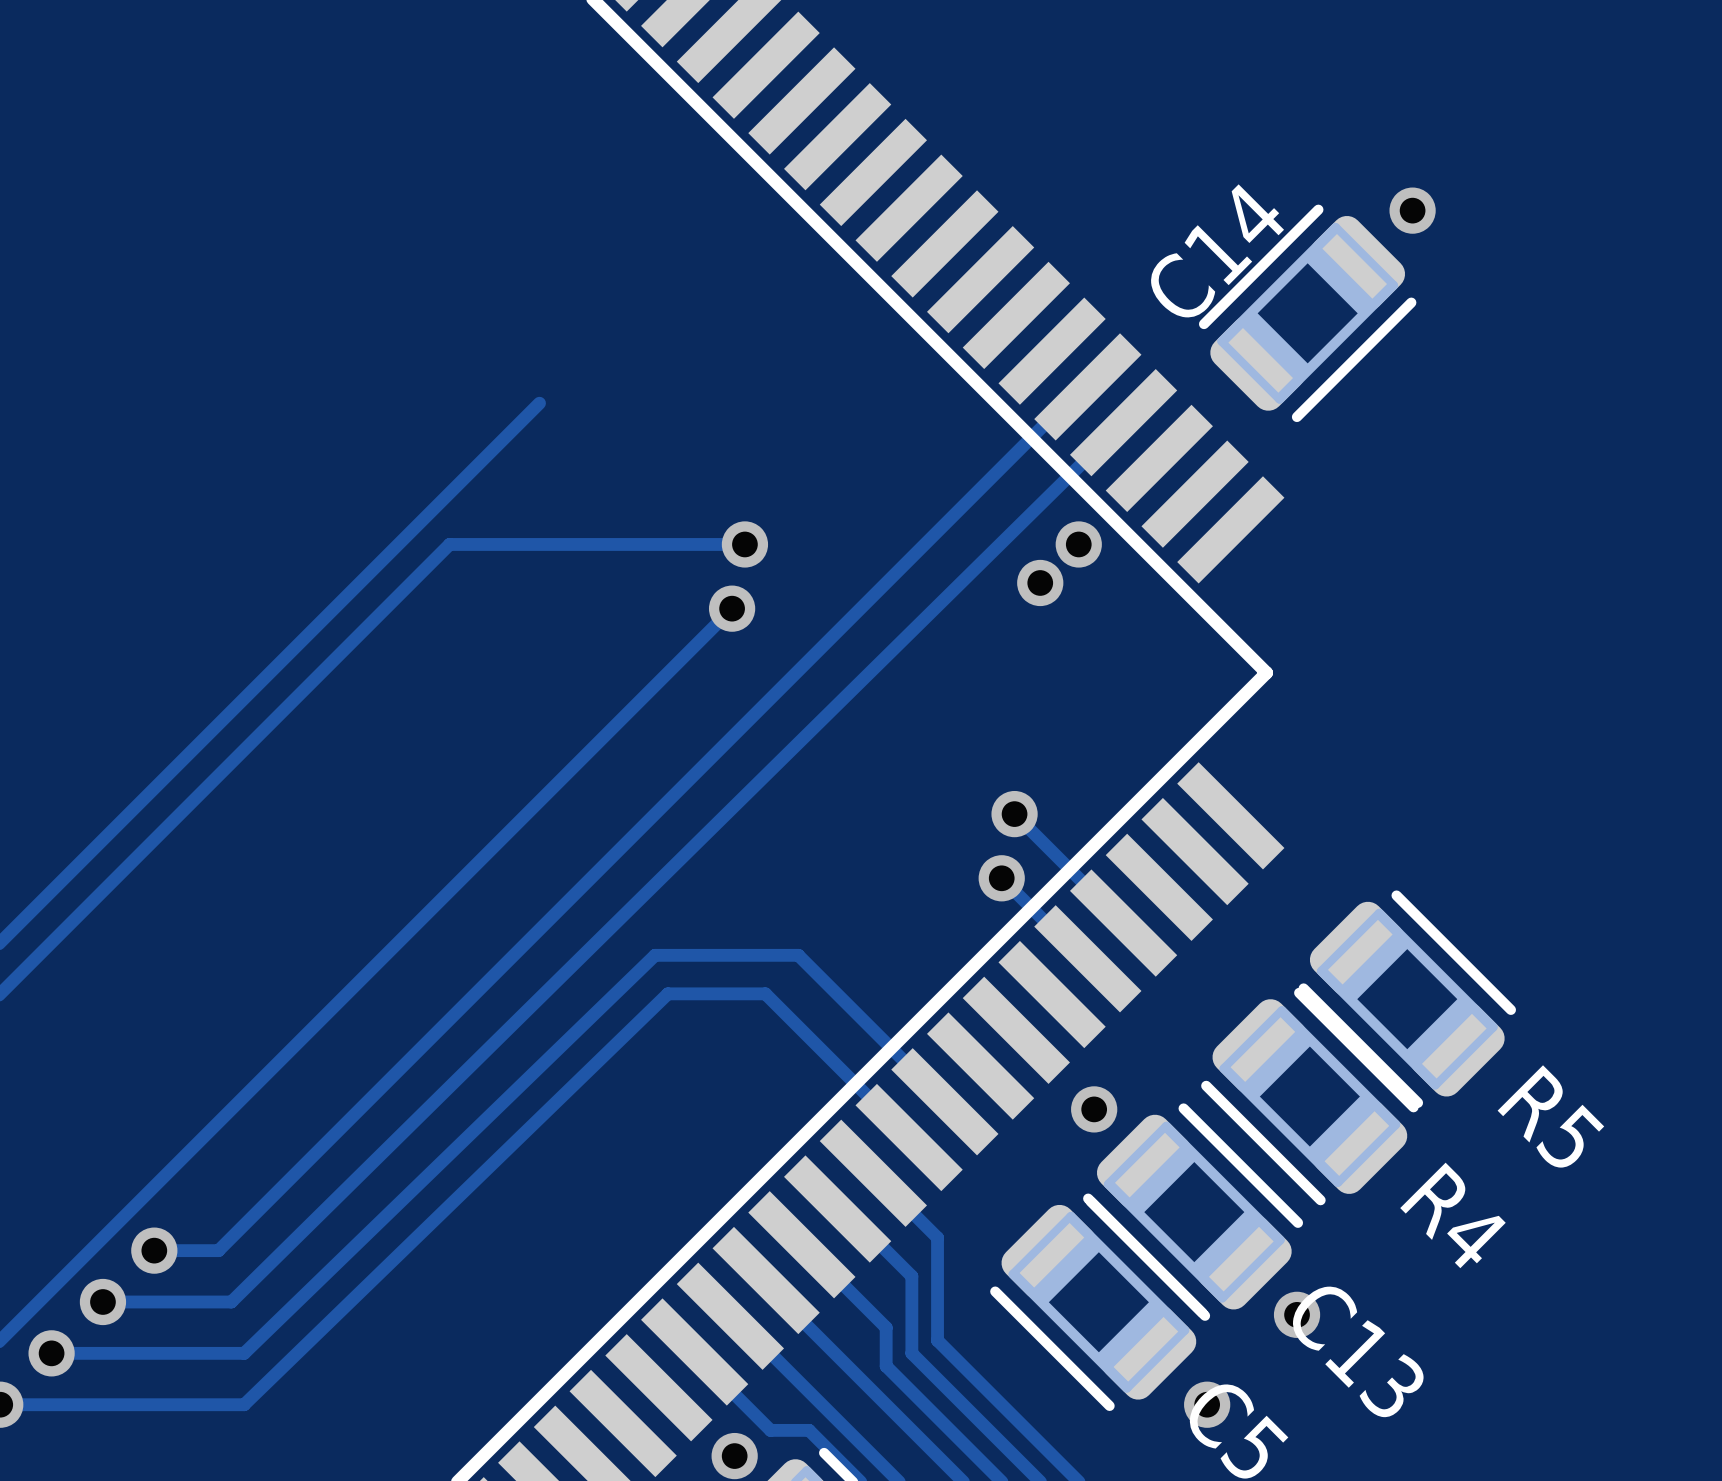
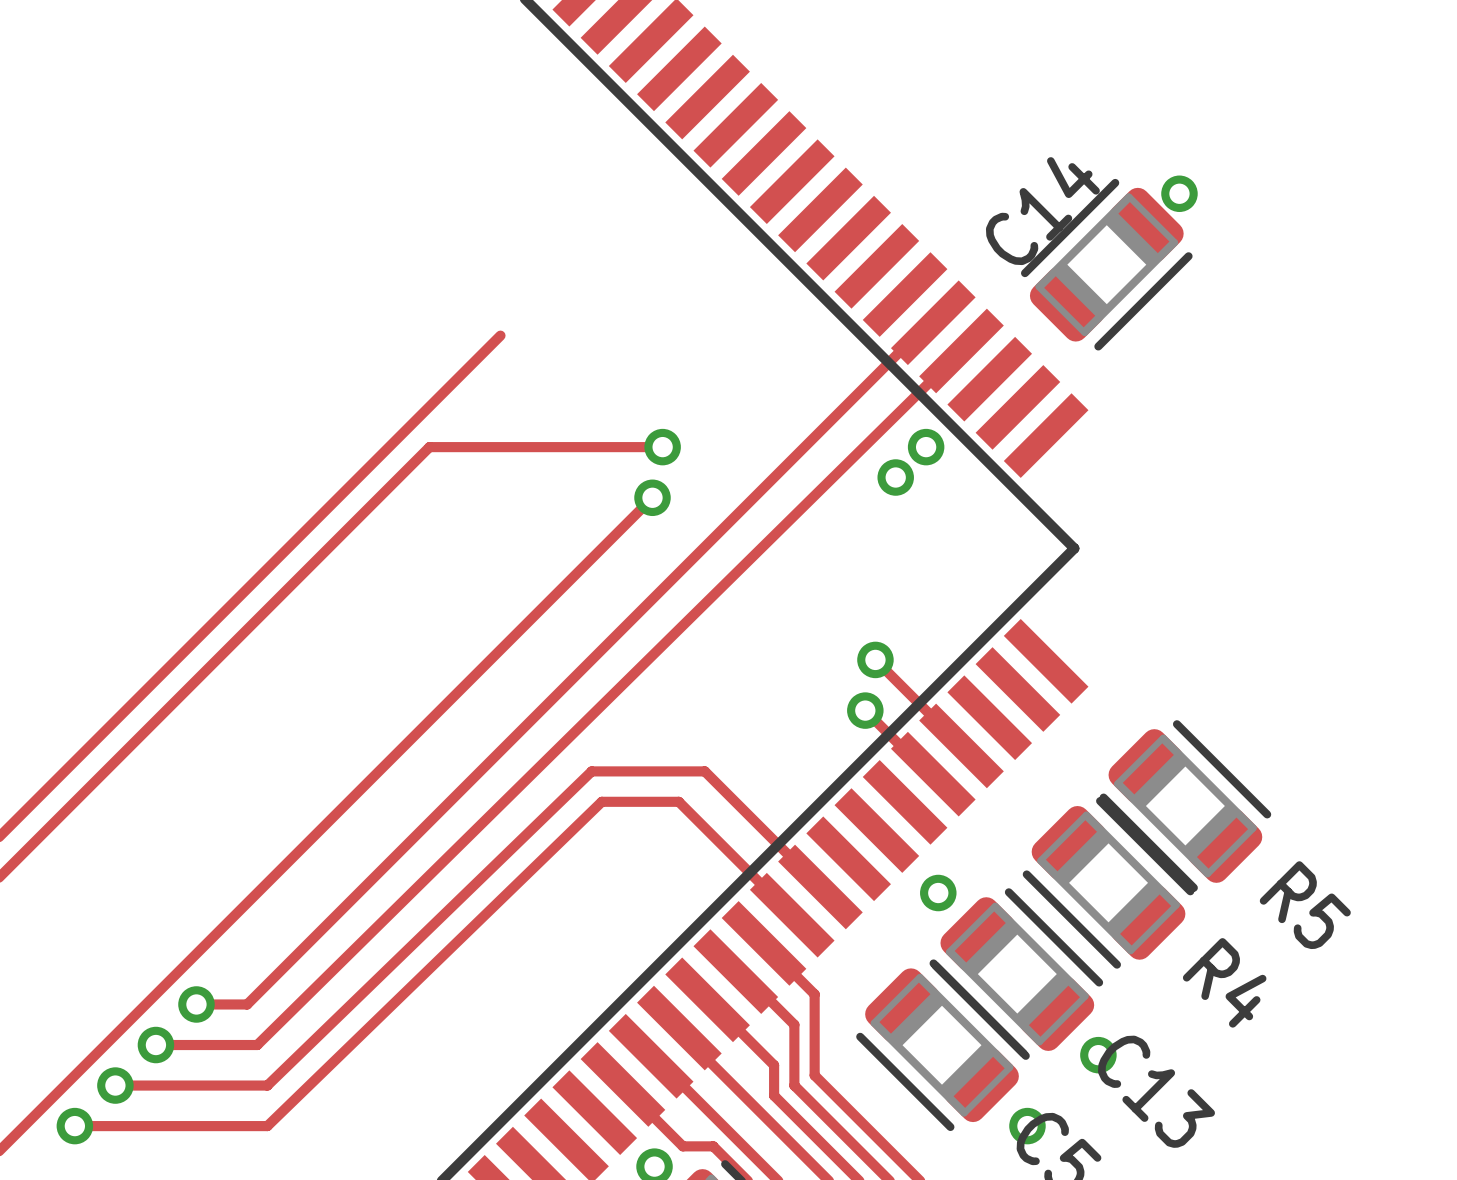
via position: (1412, 210) -> (1179, 193)

